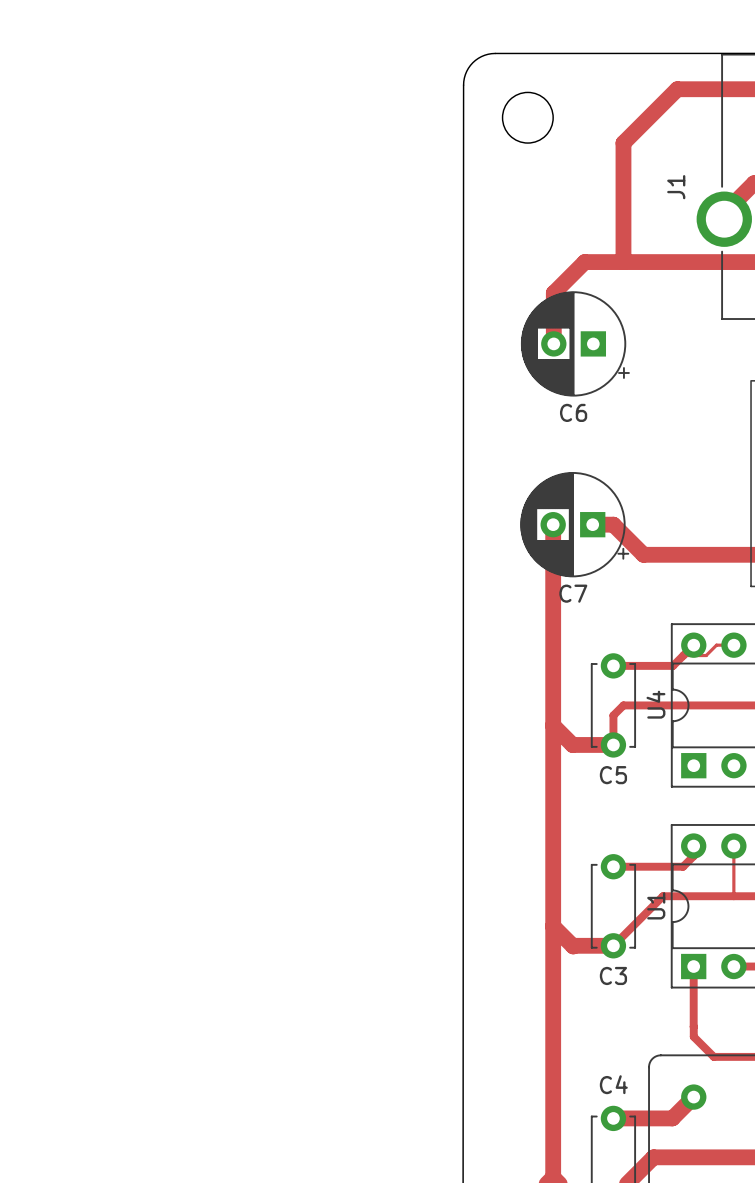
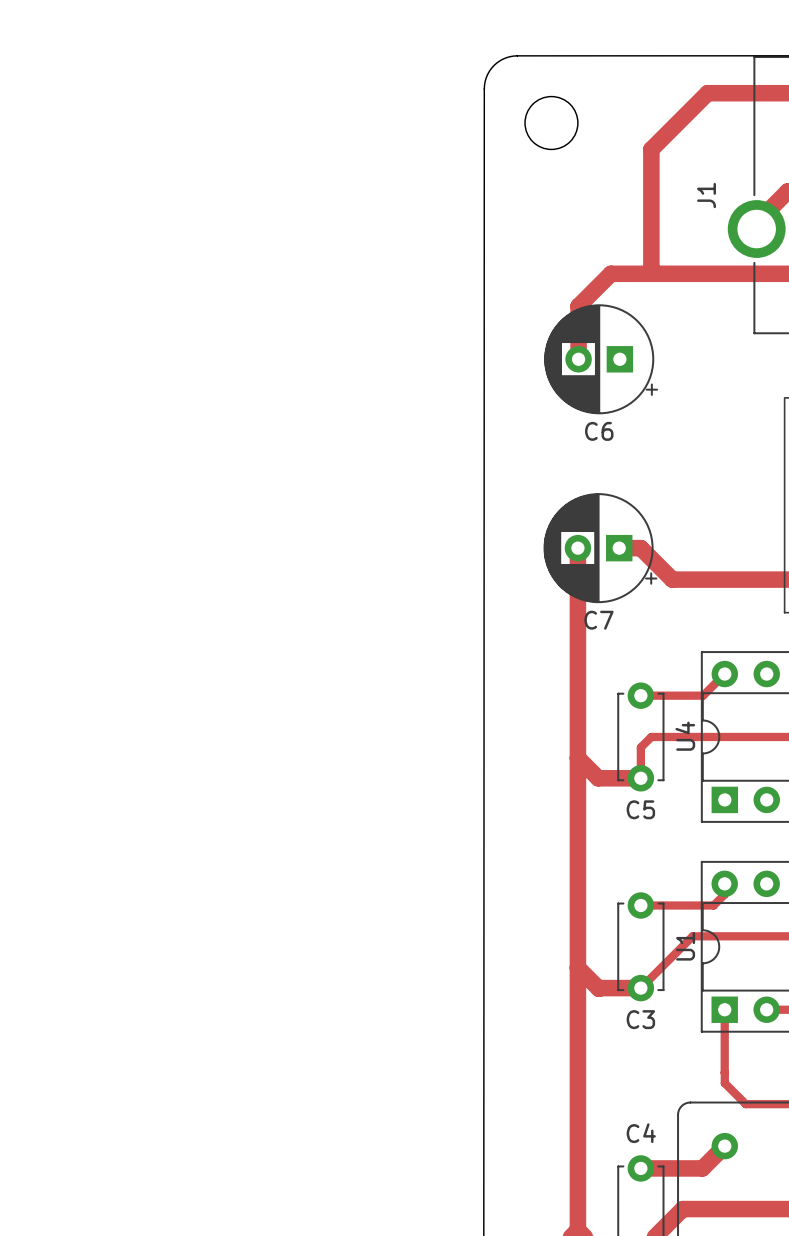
track: (733, 645) (716, 645) (706, 655) (683, 655) -> none
track: (733, 846) (733, 896) -> none

